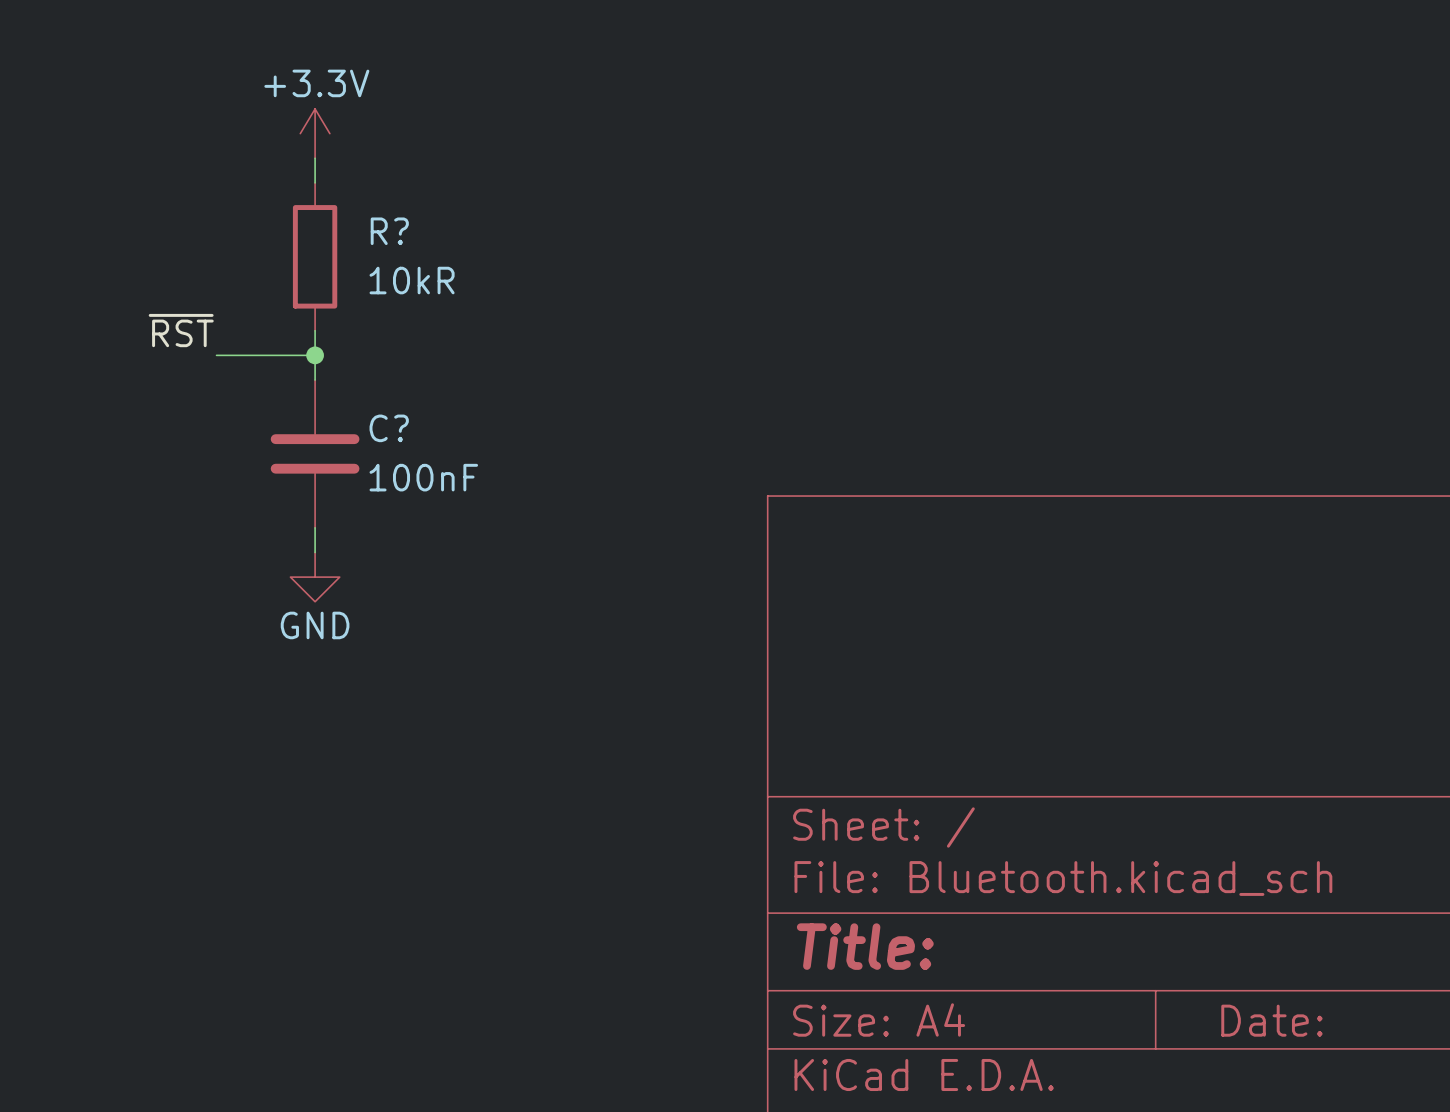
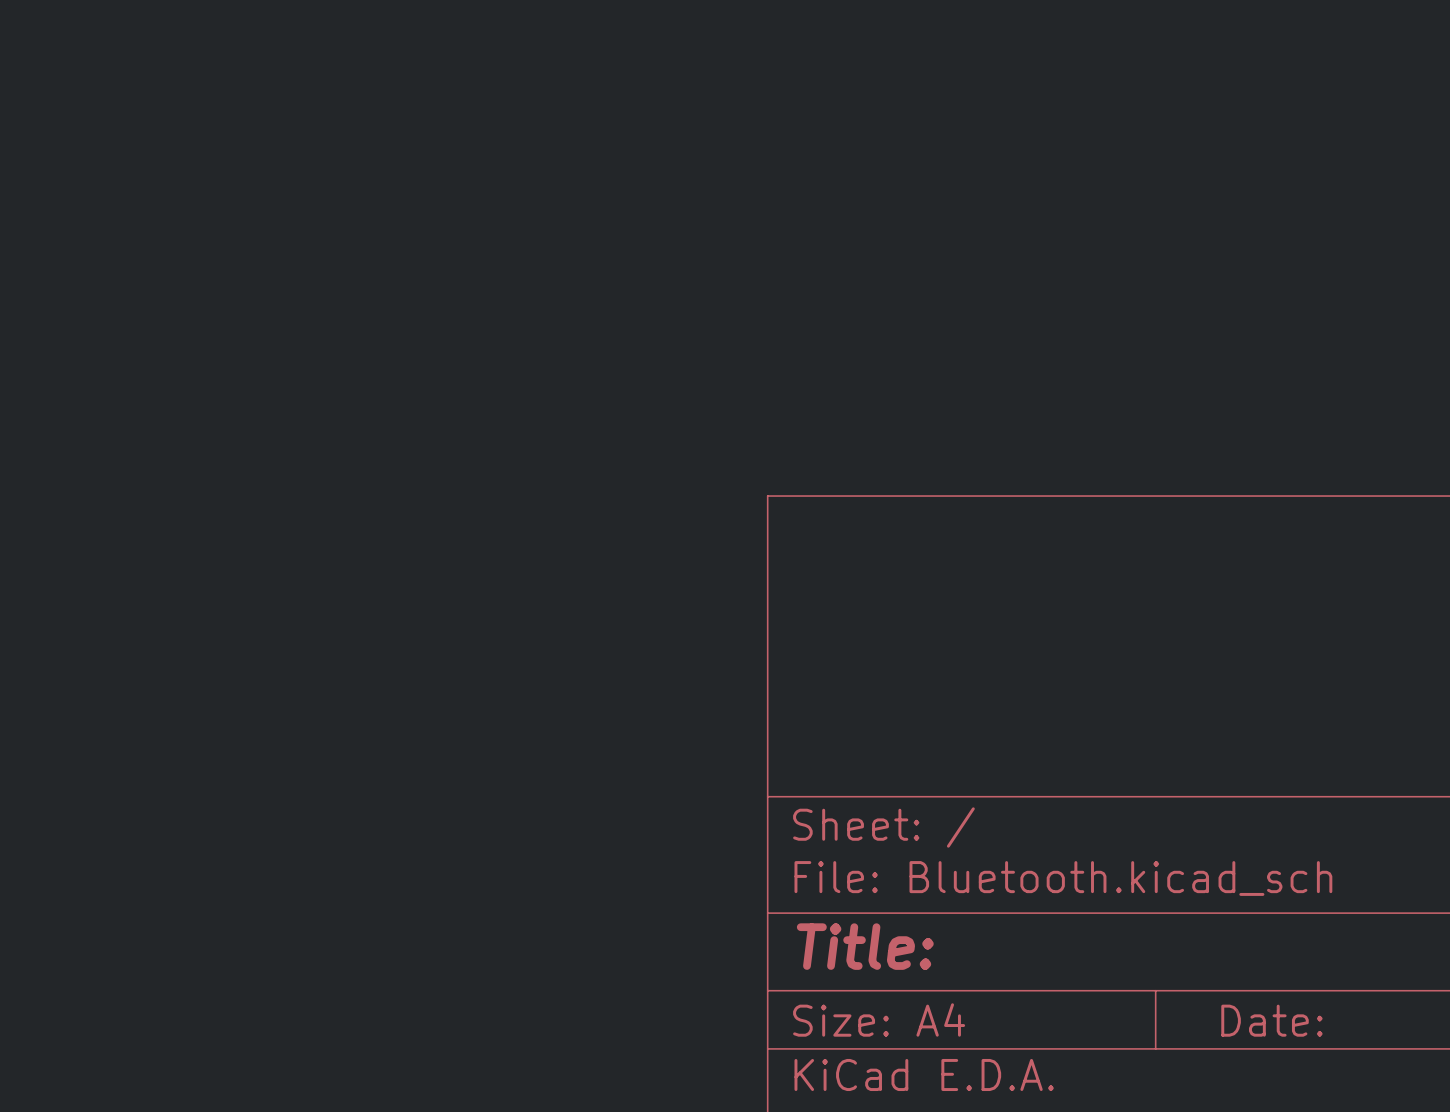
power symbol: +3.3V (315, 133) -> none
wire: (315, 158) (315, 182) -> none
R?: 10kR (315, 256) -> none
label: ~{RST} (181, 330) -> none
wire: (315, 330) (315, 380) -> none
wire: (216, 355) (315, 355) -> none
junction: (315, 355) -> none
C?: 100nF (315, 453) -> none
wire: (315, 527) (315, 552) -> none
power symbol: GND (315, 577) -> none

